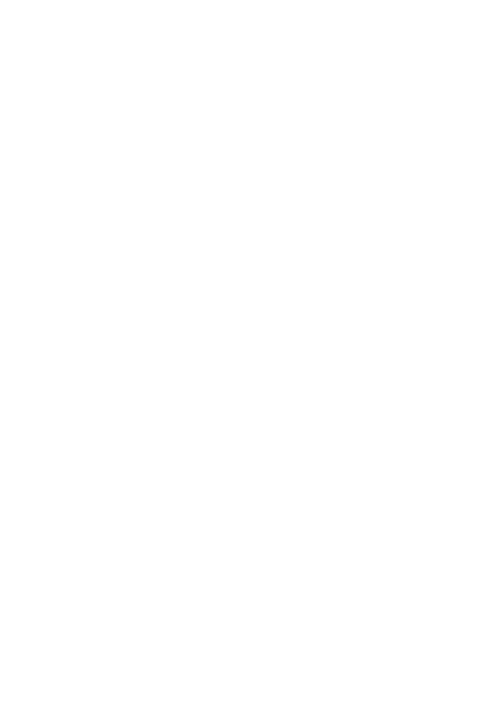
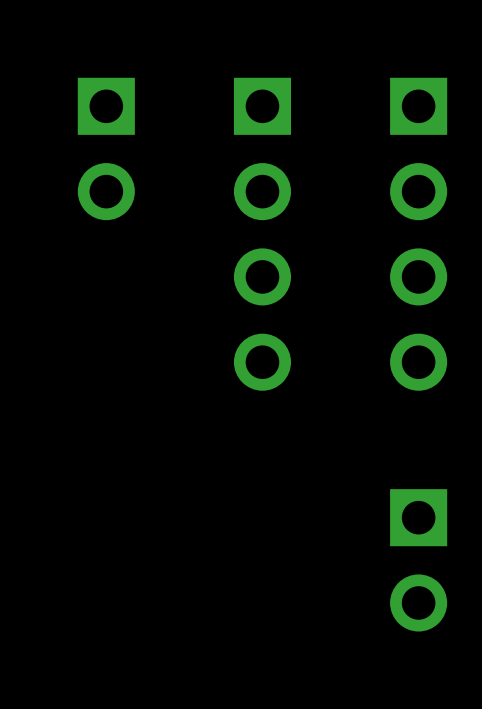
part: none -> (106, 148)
part: none -> (262, 234)
part: none -> (418, 234)
part: none -> (418, 560)

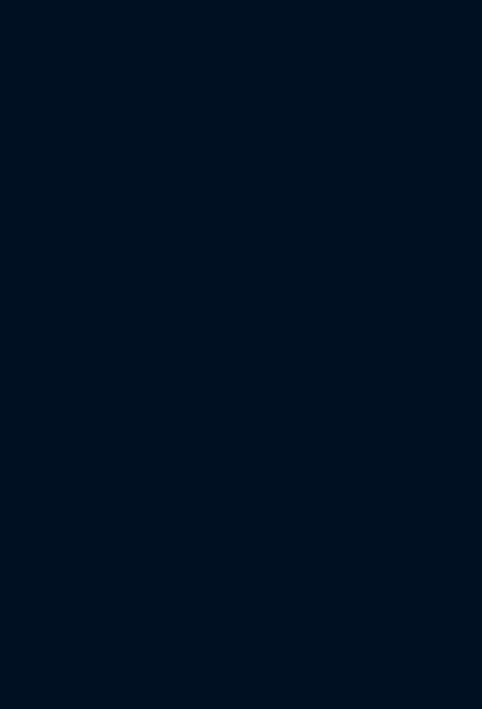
part: (106, 148) -> none
part: (262, 234) -> none
part: (418, 234) -> none
part: (418, 560) -> none

